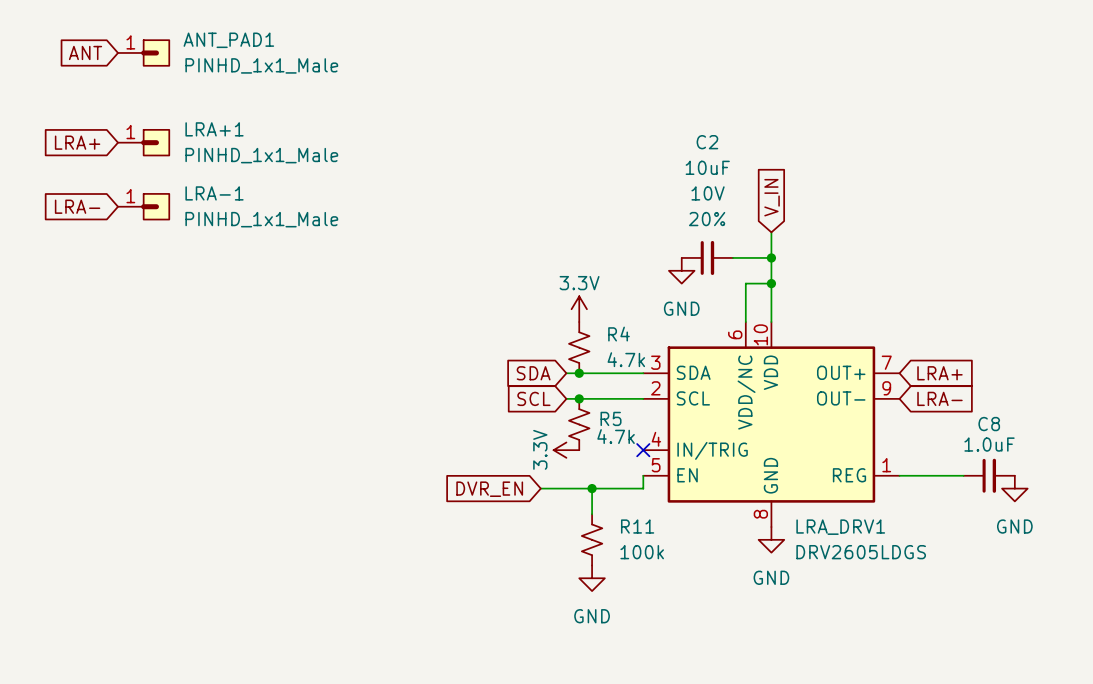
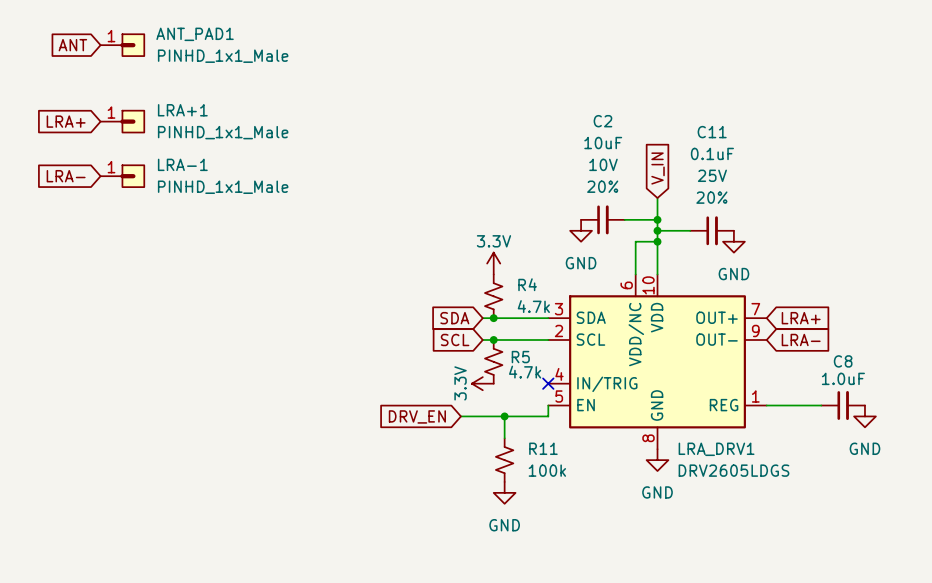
wire: none -> (657, 230) (690, 230)
junction: none -> (657, 230)
C11: none -> 0.1uF (712, 230)
power symbol: none -> GND (733, 241)
global label: DVR_EN (489, 489) -> DRV_EN (417, 416)

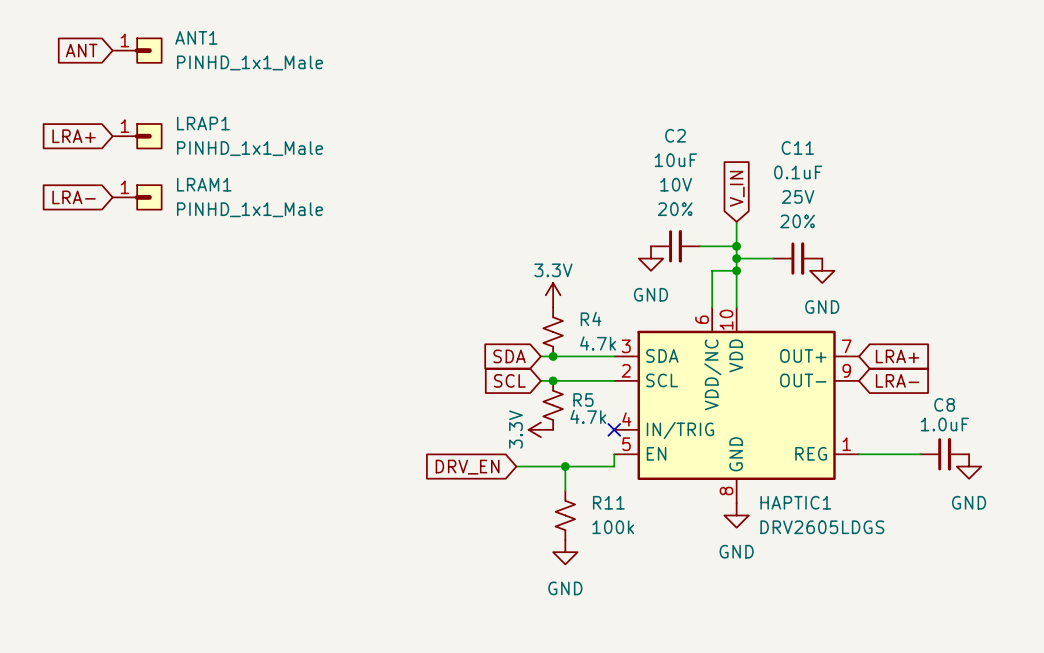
ANT_PAD1 name: ANT_PAD1 (195, 34) -> ANT1 (196, 37)
LRA+1 name: LRA+1 (182, 110) -> LRAP1 (203, 123)
LRA-1 name: LRA-1 (182, 164) -> LRAM1 (204, 184)
LRA_DRV1 name: LRA_DRV1 (716, 449) -> HAPTIC1 (795, 502)

